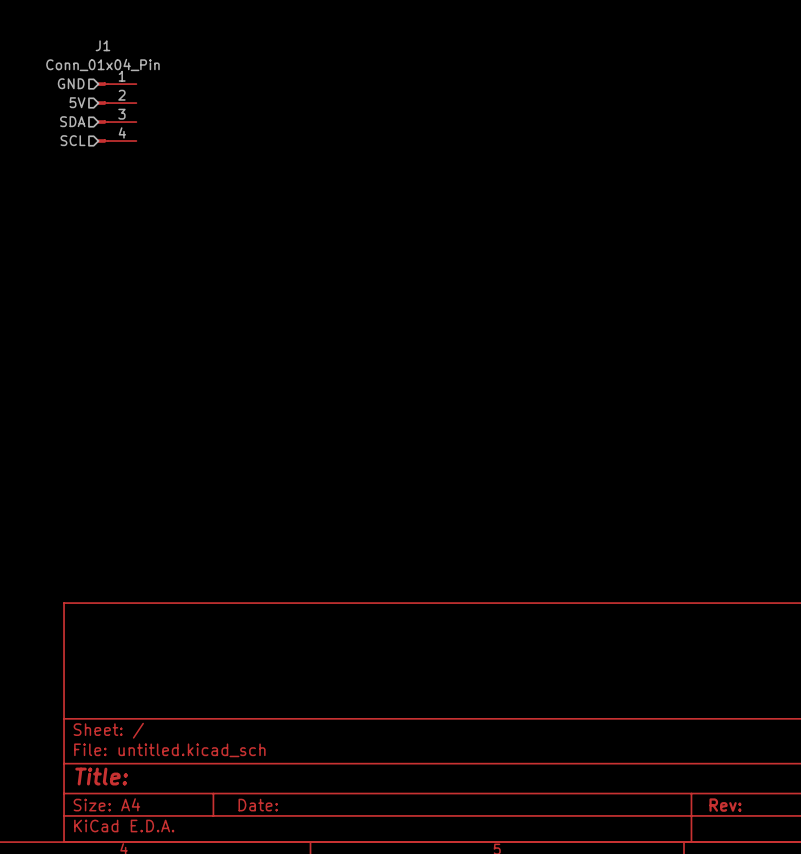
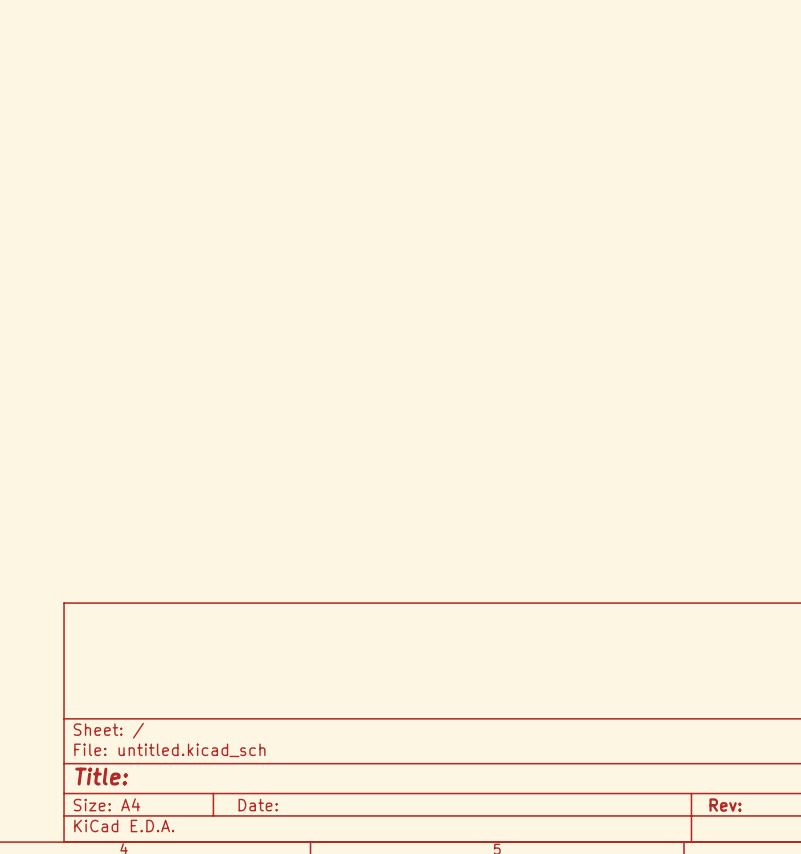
hierarchical label: GND (71, 83) -> none
hierarchical label: 5V (77, 102) -> none
J1: Conn_01x04_Pin (117, 112) -> none
hierarchical label: SDA (72, 121) -> none
hierarchical label: SCL (73, 140) -> none

